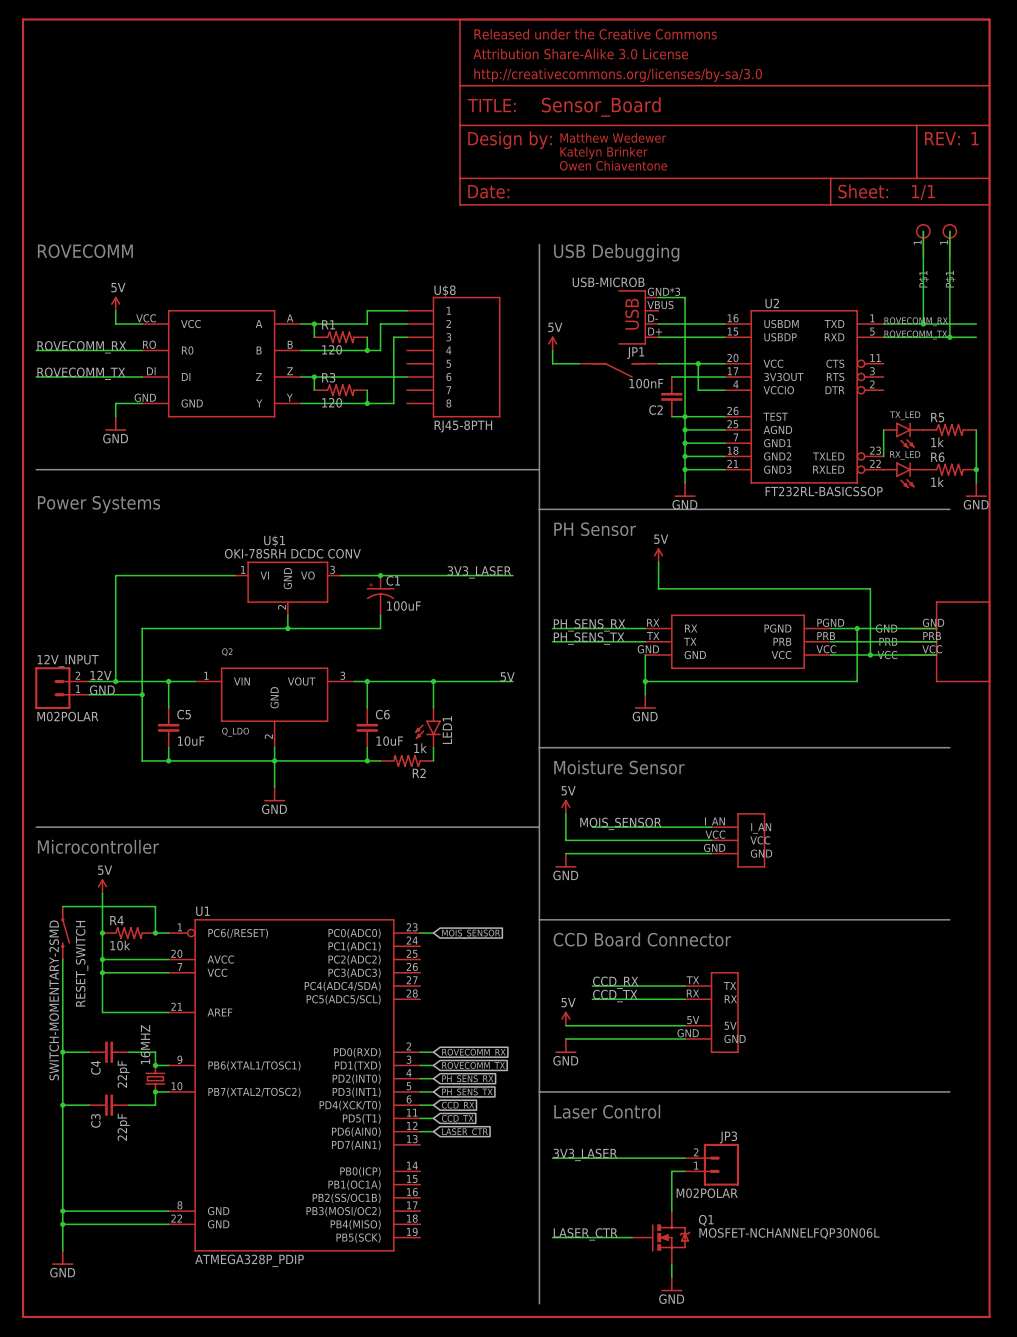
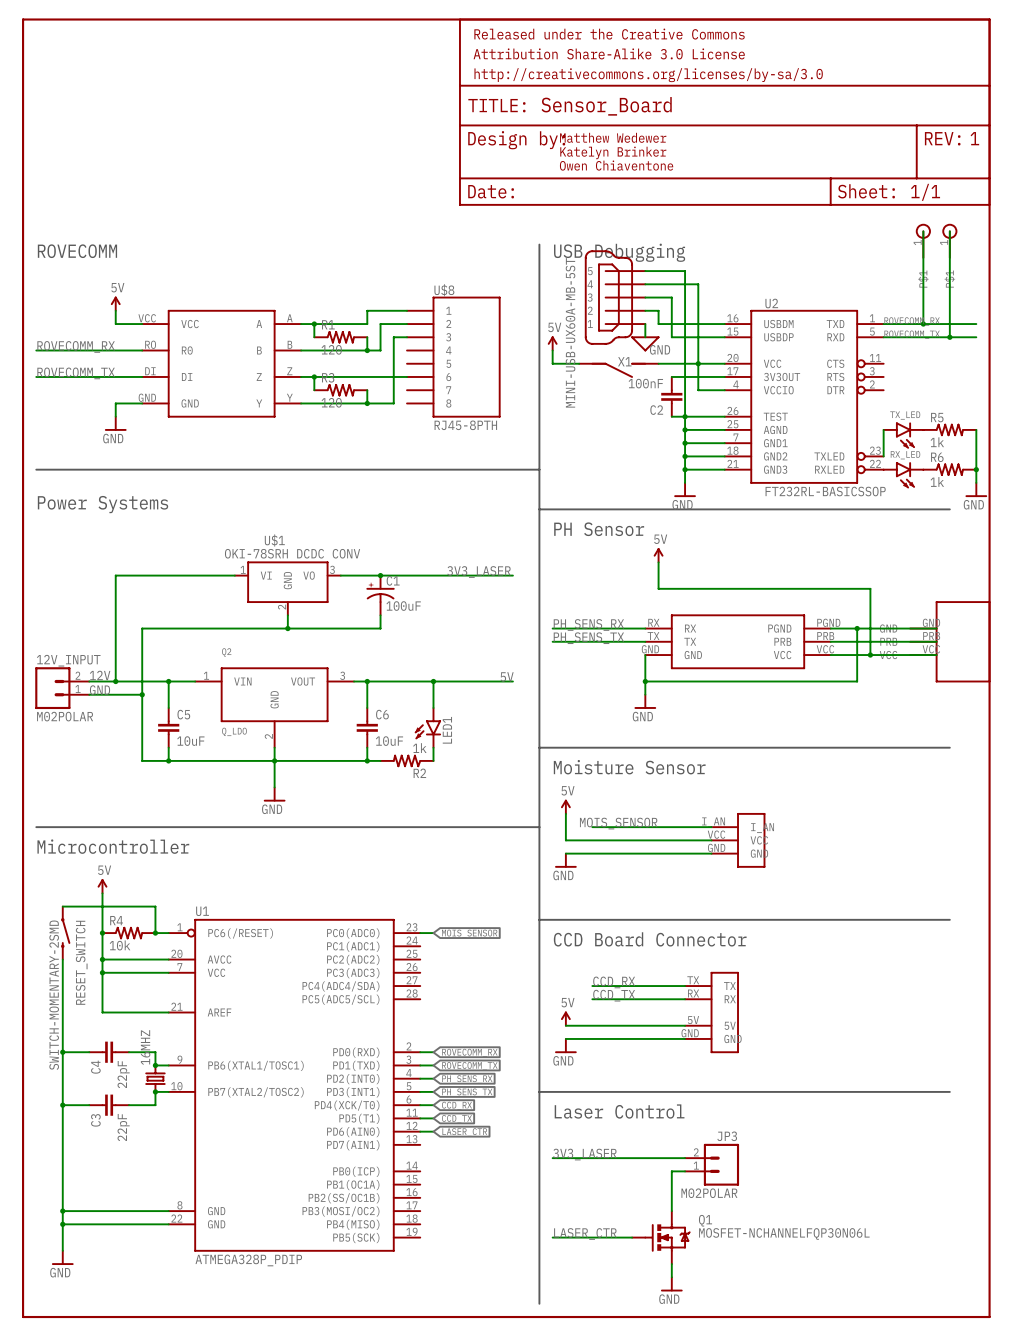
wire: none -> (645, 284) (698, 284) (698, 363)
X1: none -> MINI-USB-UX60A-MB-5ST (615, 297)
wire: (671, 297) (685, 297) -> (645, 271) (685, 271) (685, 297)
JP1: USB-MICROB (638, 317) -> none
wire: (658, 337) (671, 337) -> (671, 297) (671, 337)
part: none -> (645, 343)
text: none -> GND (660, 349)

